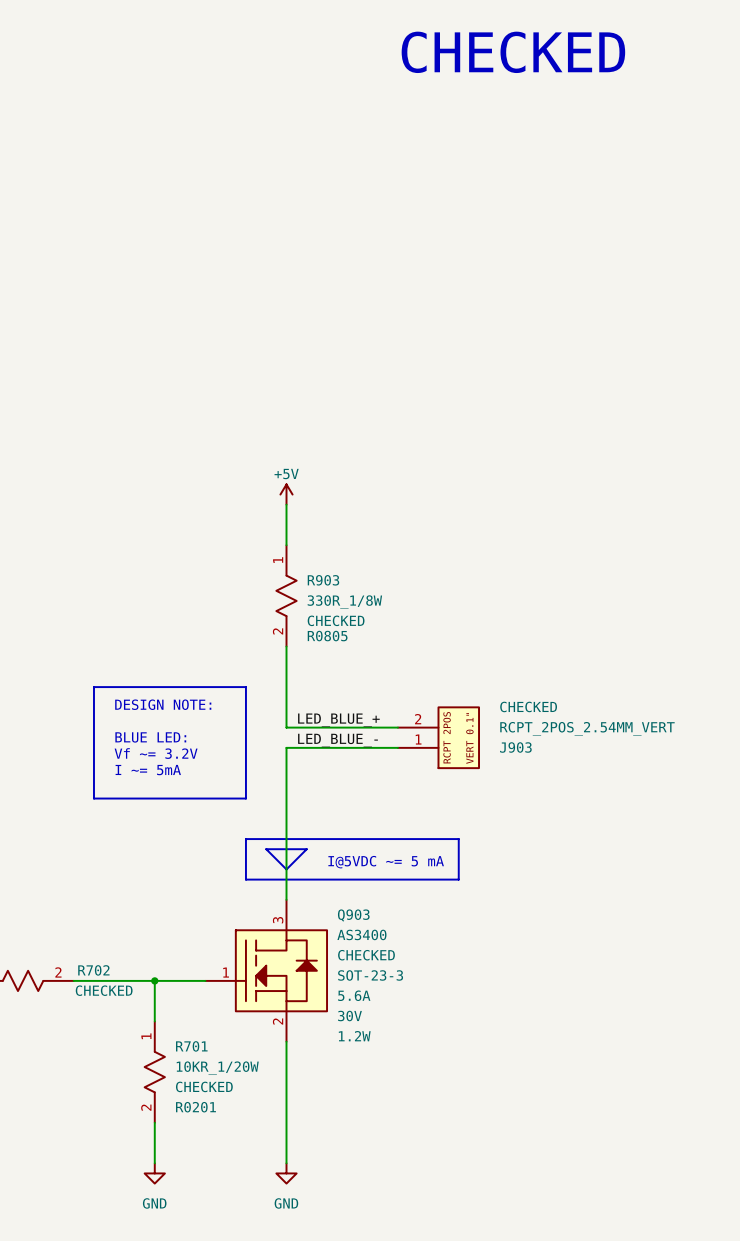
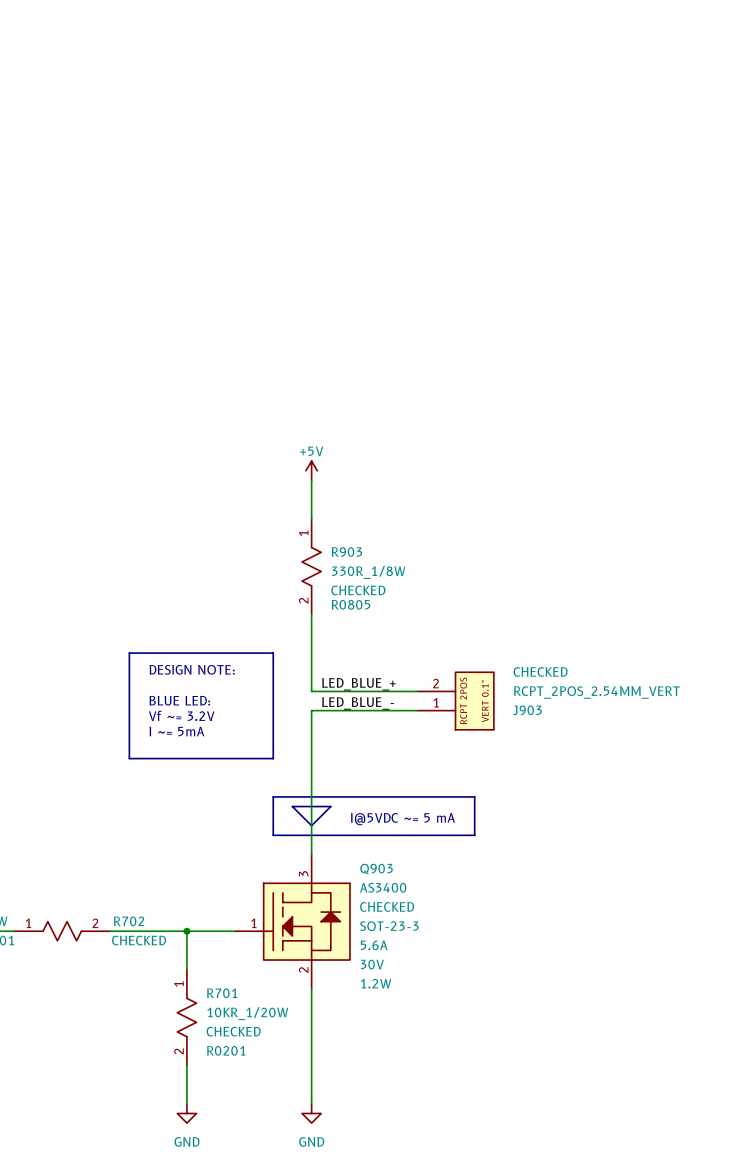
text: CHECKED (513, 52) -> none

